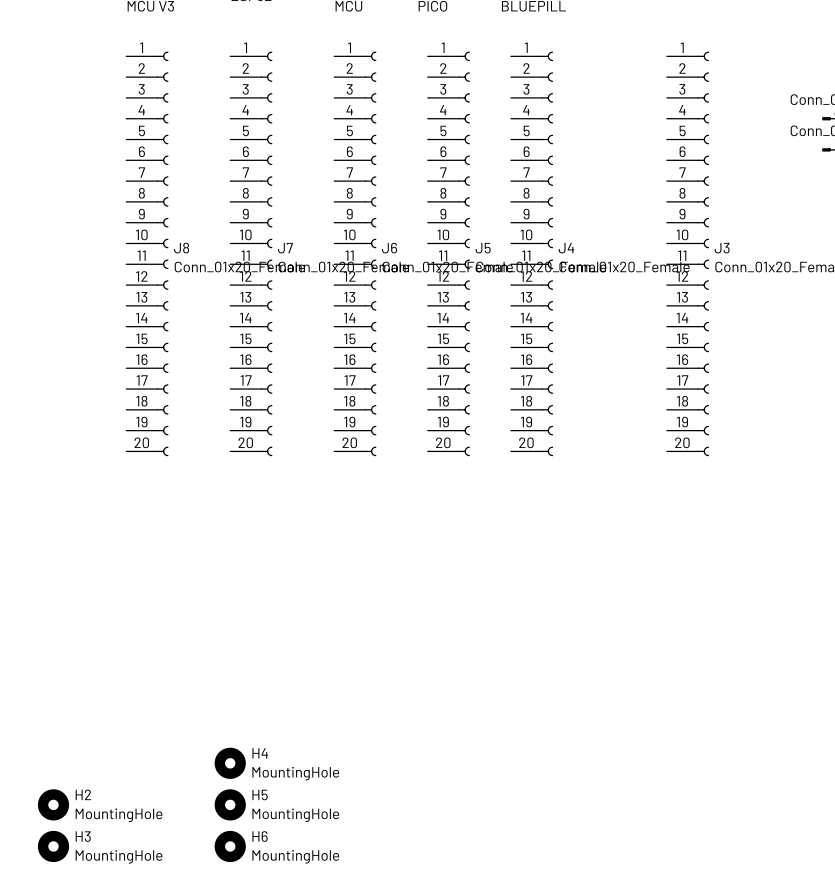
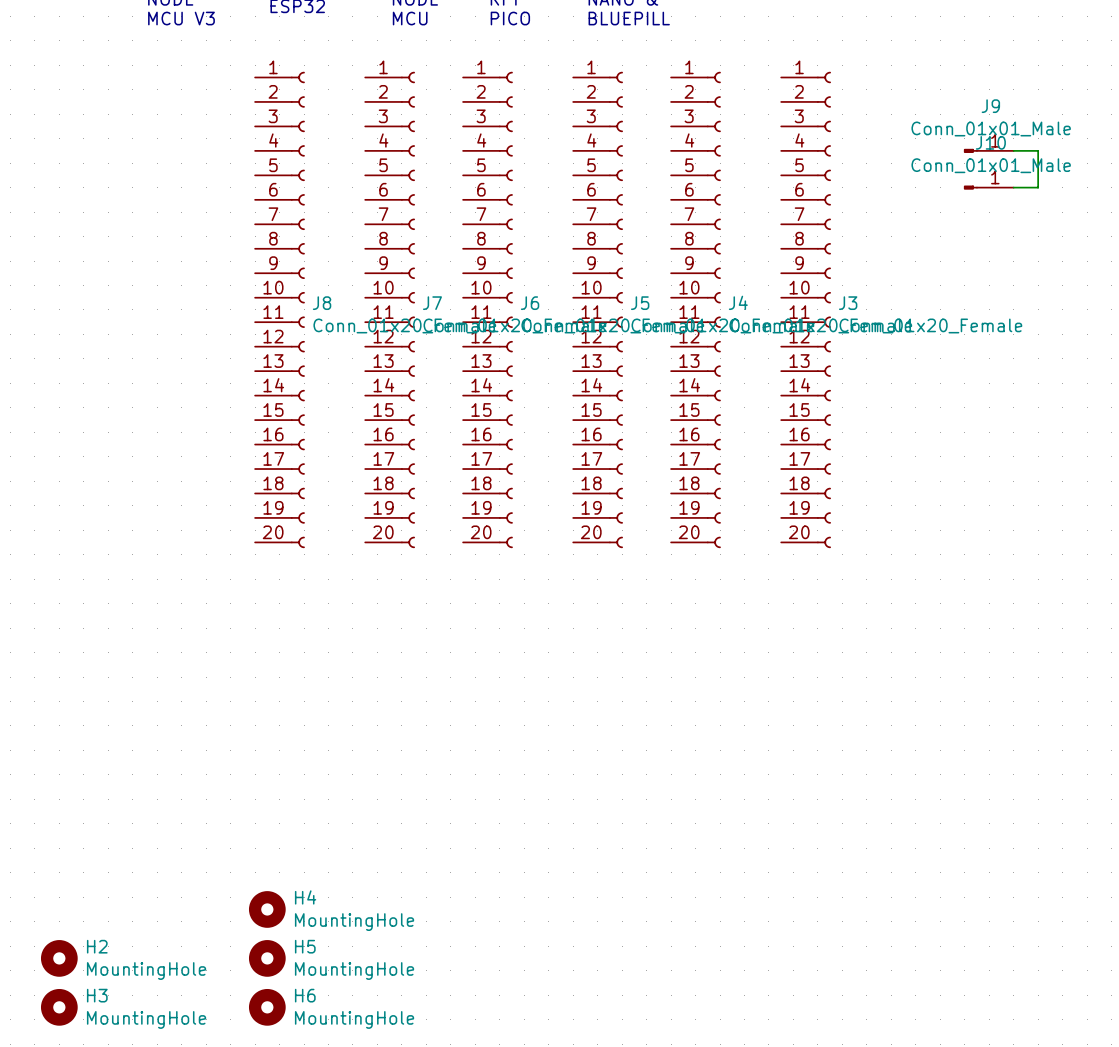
J8 position: (147, 253) -> (279, 309)
J7 position: (251, 253) -> (390, 309)
J6 position: (355, 253) -> (487, 309)
J5 position: (448, 253) -> (598, 309)
J4 position: (532, 253) -> (695, 309)

